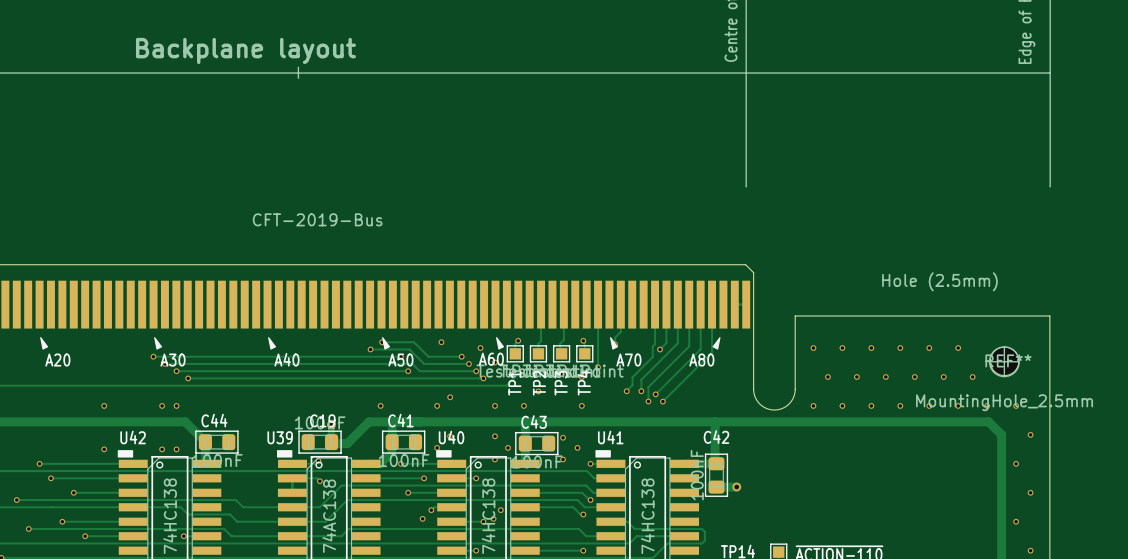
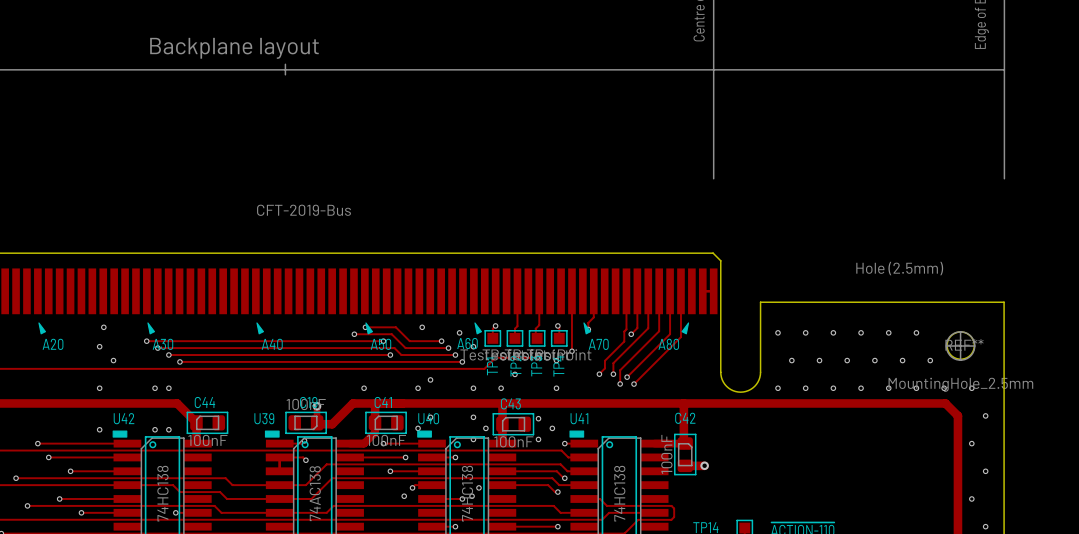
via: none -> (103, 327)
via: none -> (99, 346)
via: none -> (113, 360)

